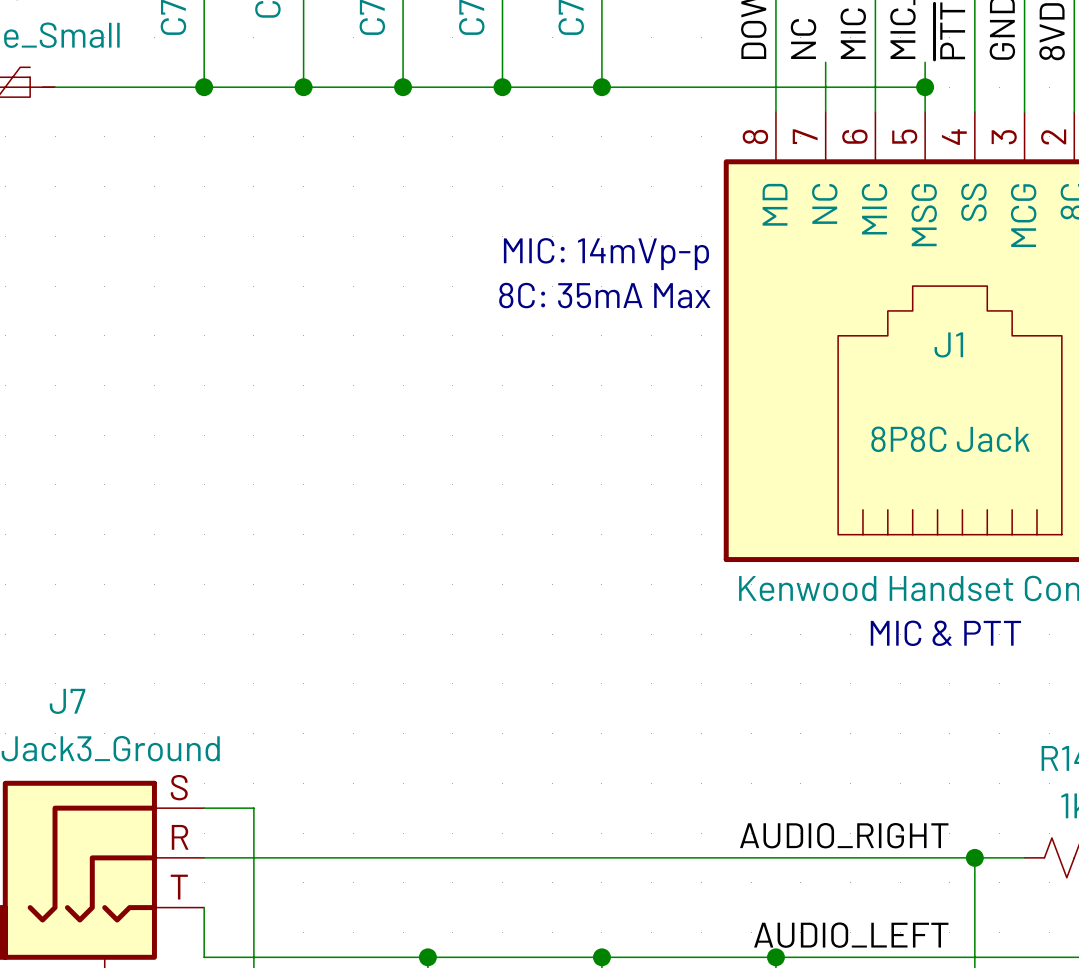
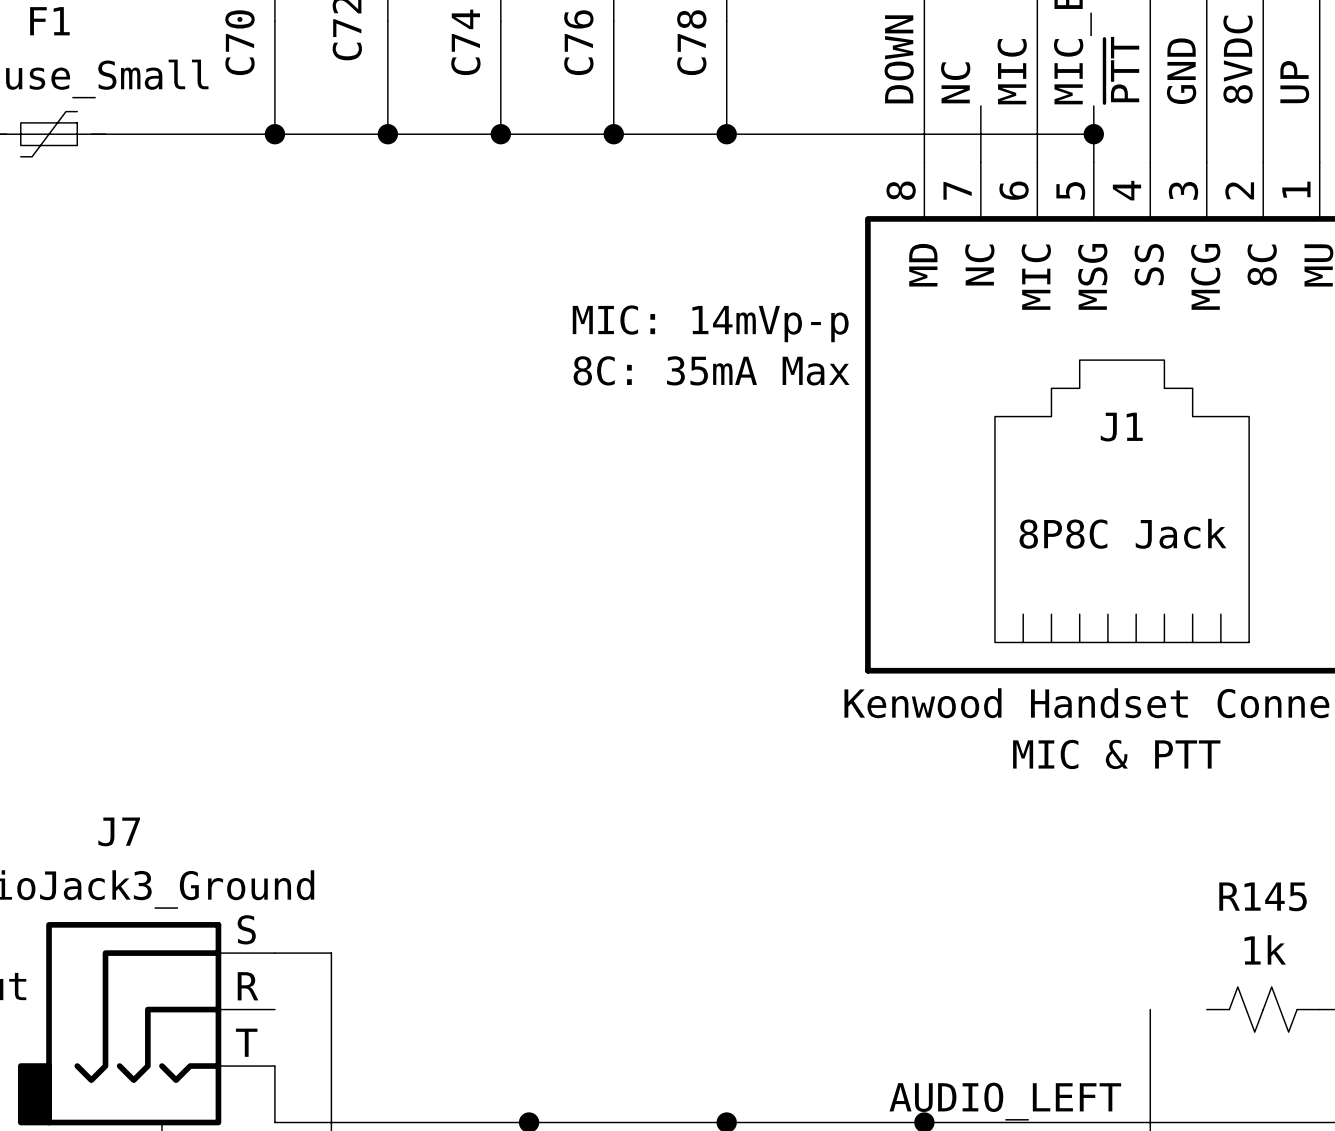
label: AUDIO_RIGHT (844, 835) -> none
wire: (204, 857) (1024, 857) -> none
junction: (974, 857) -> none

